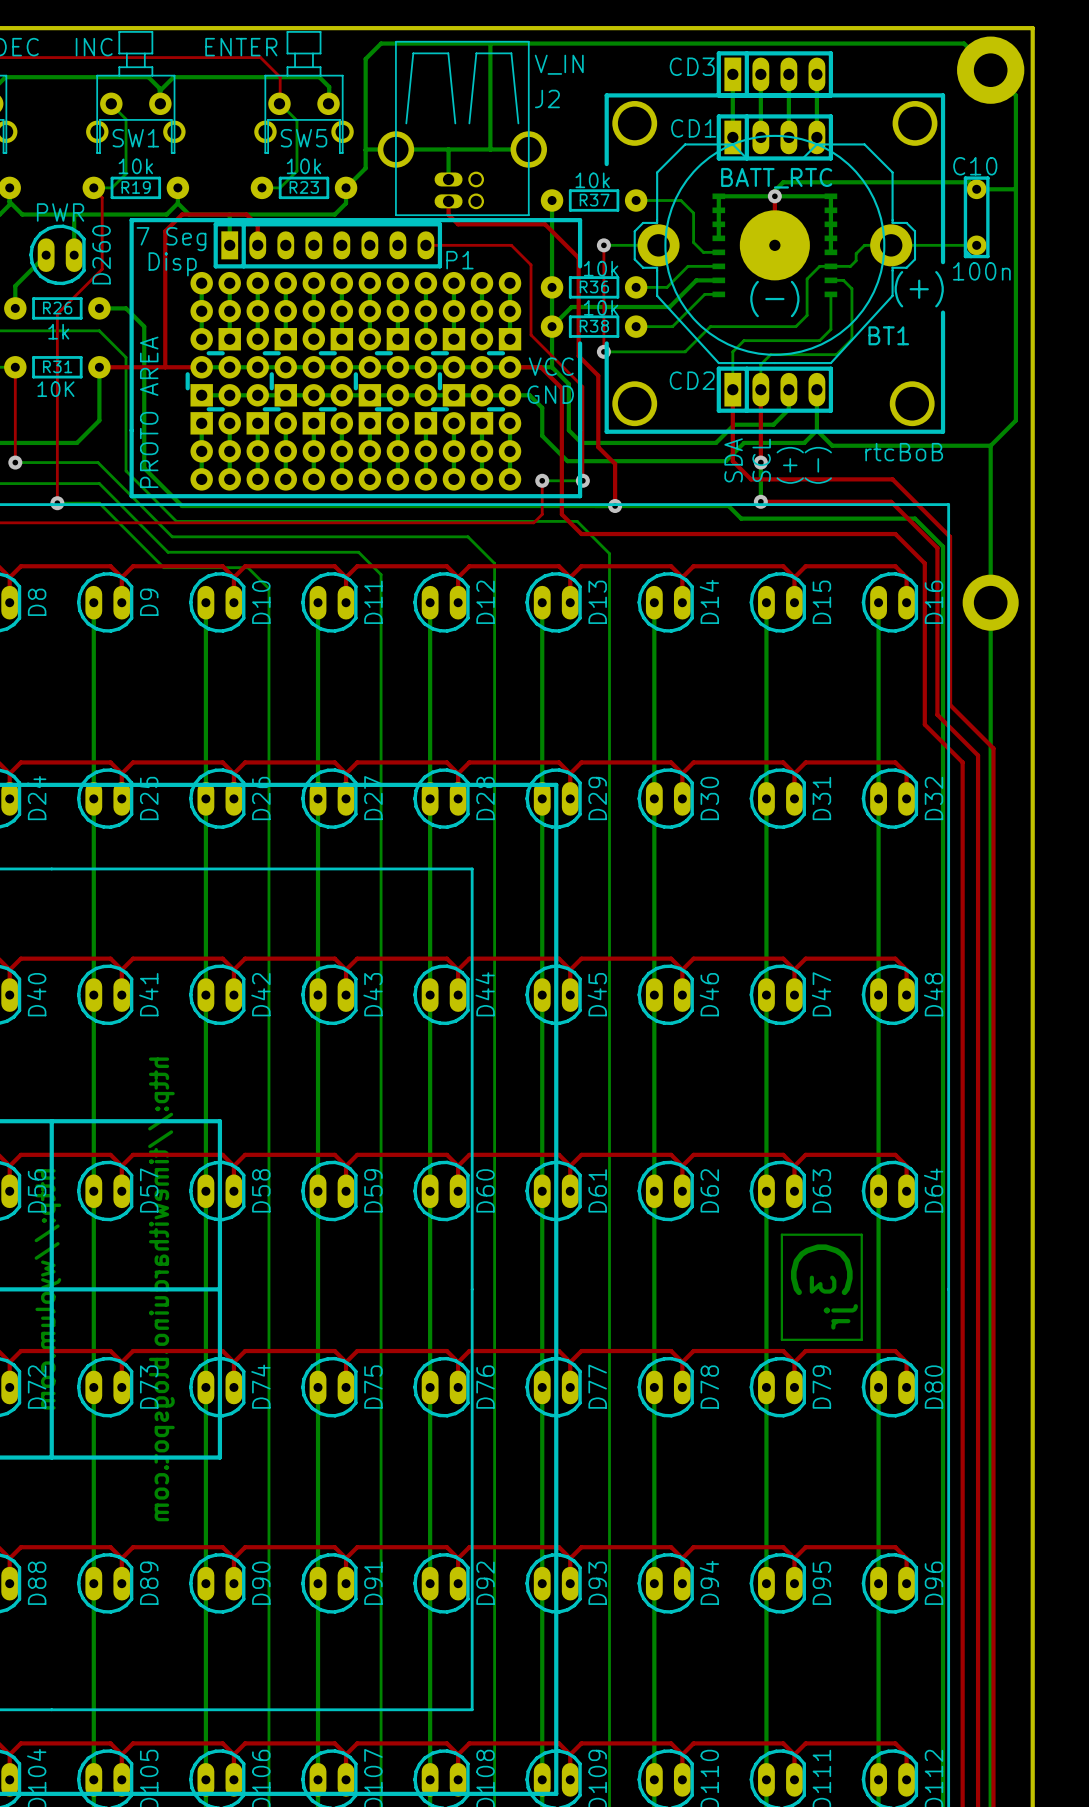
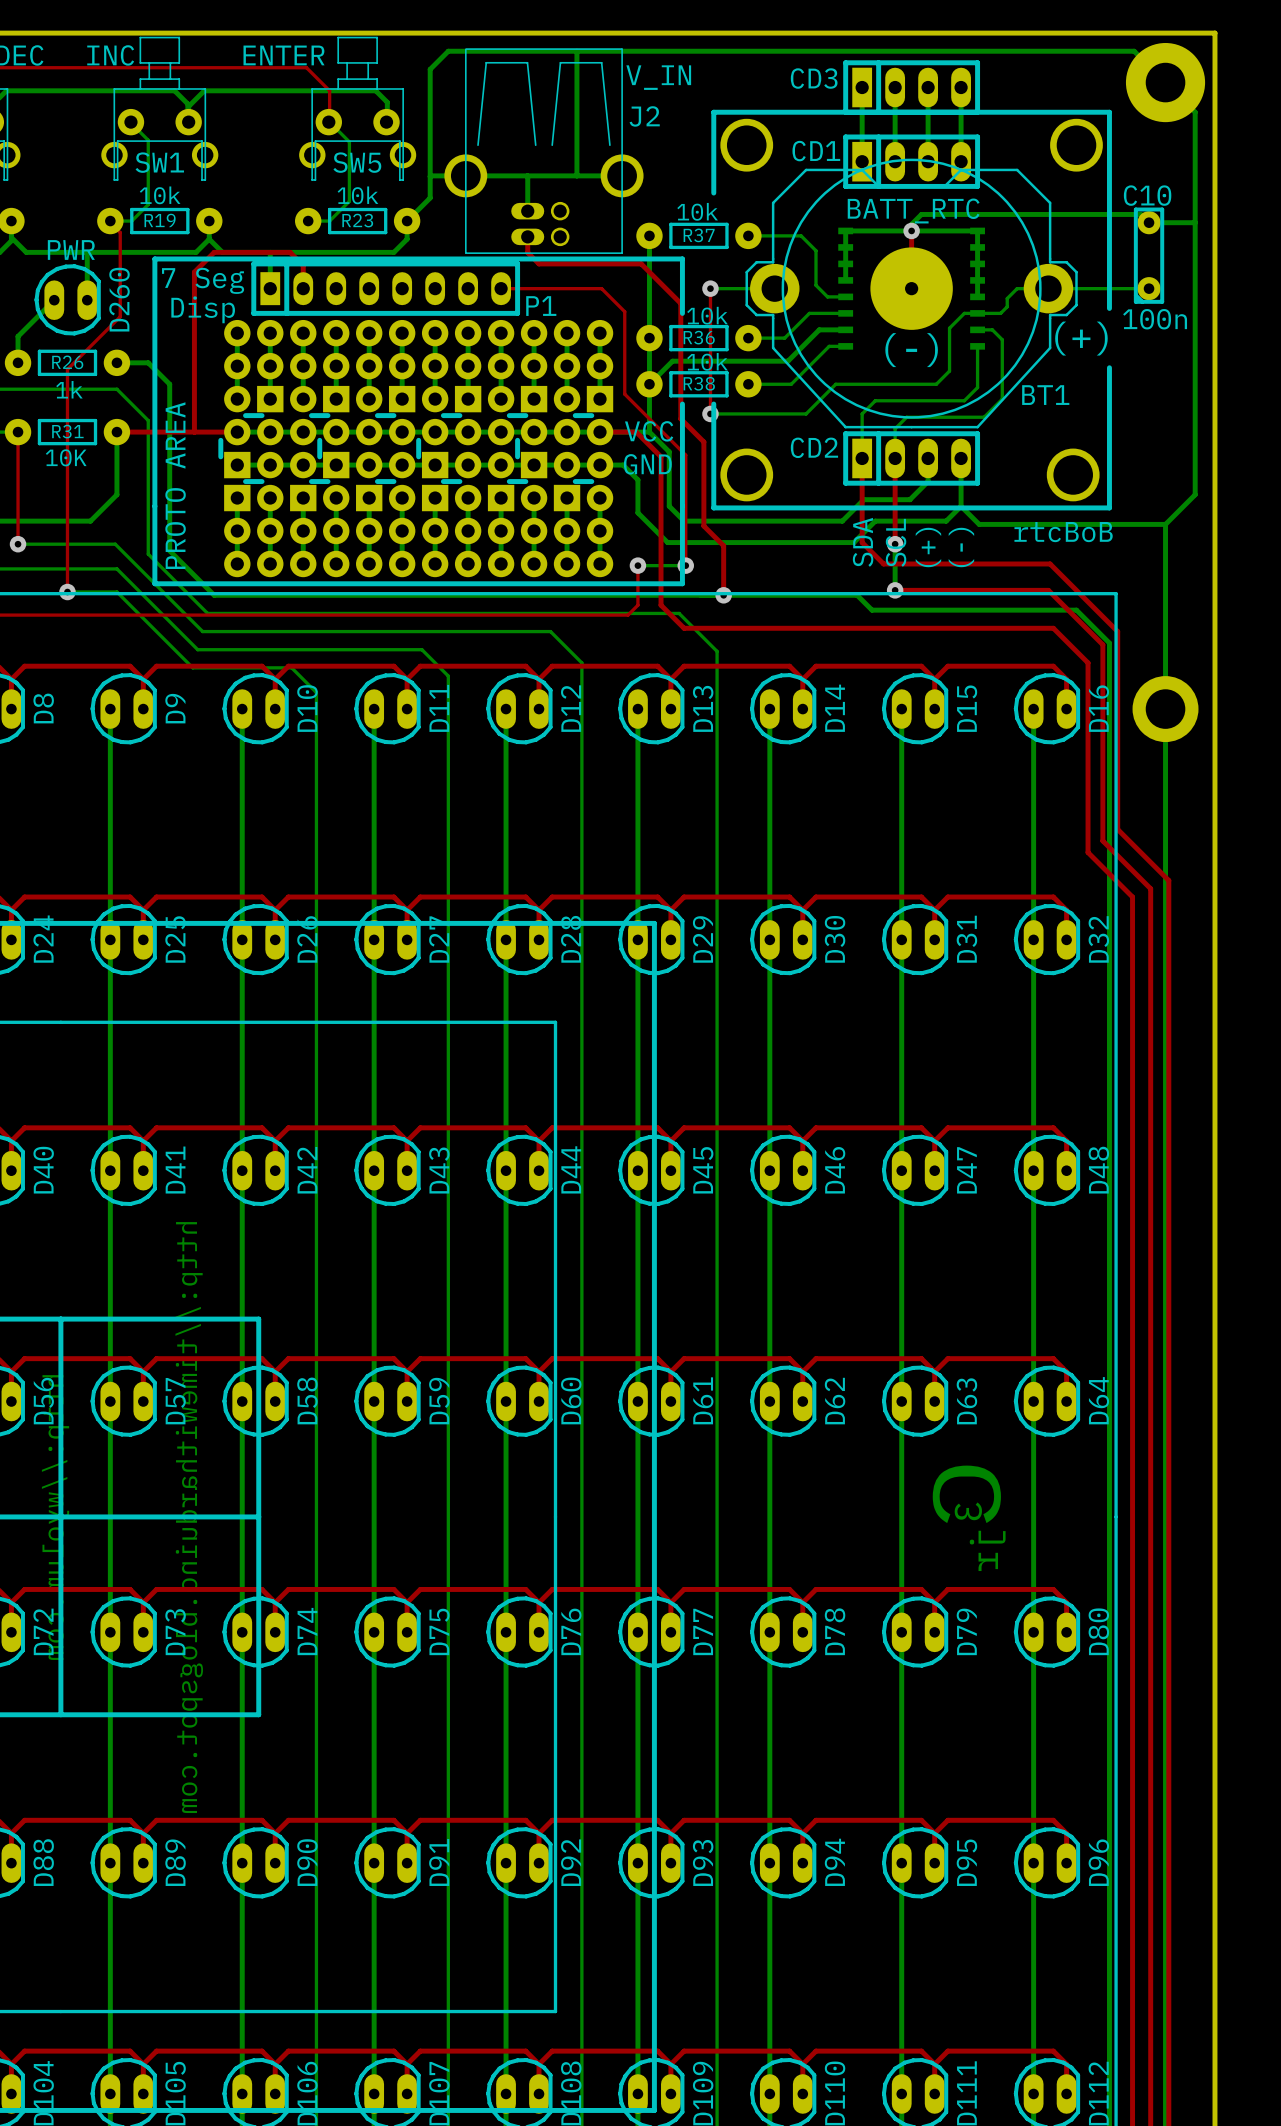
bottom track: (781, 1234) (861, 1234) (861, 1339) (781, 1339) (781, 1234) -> none

